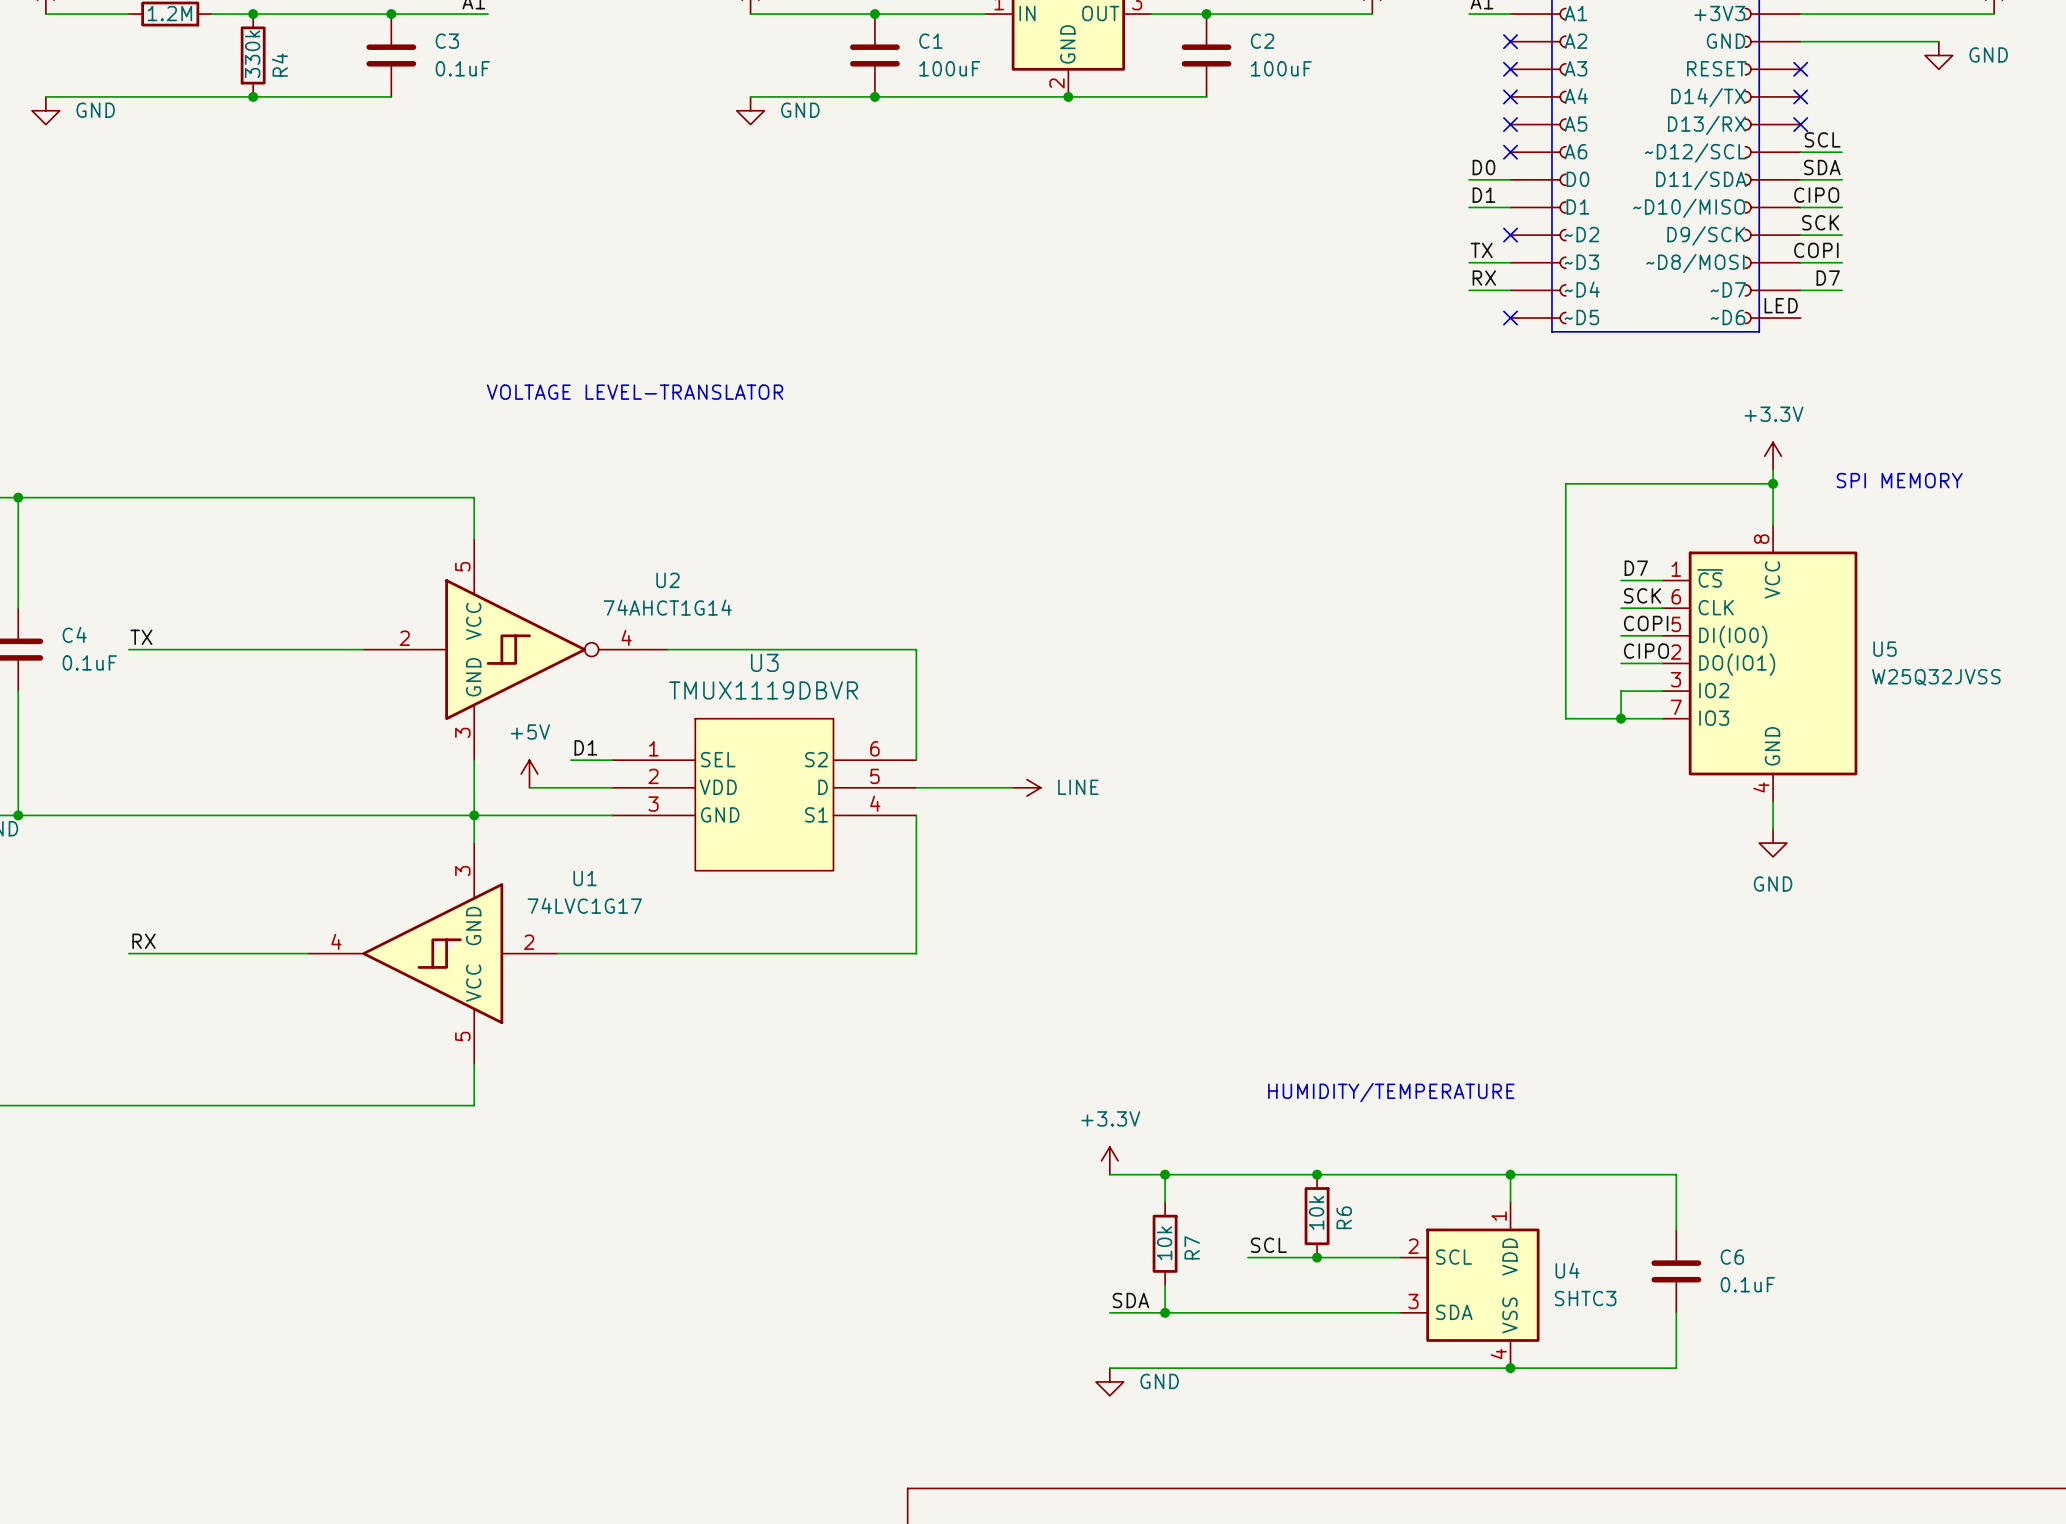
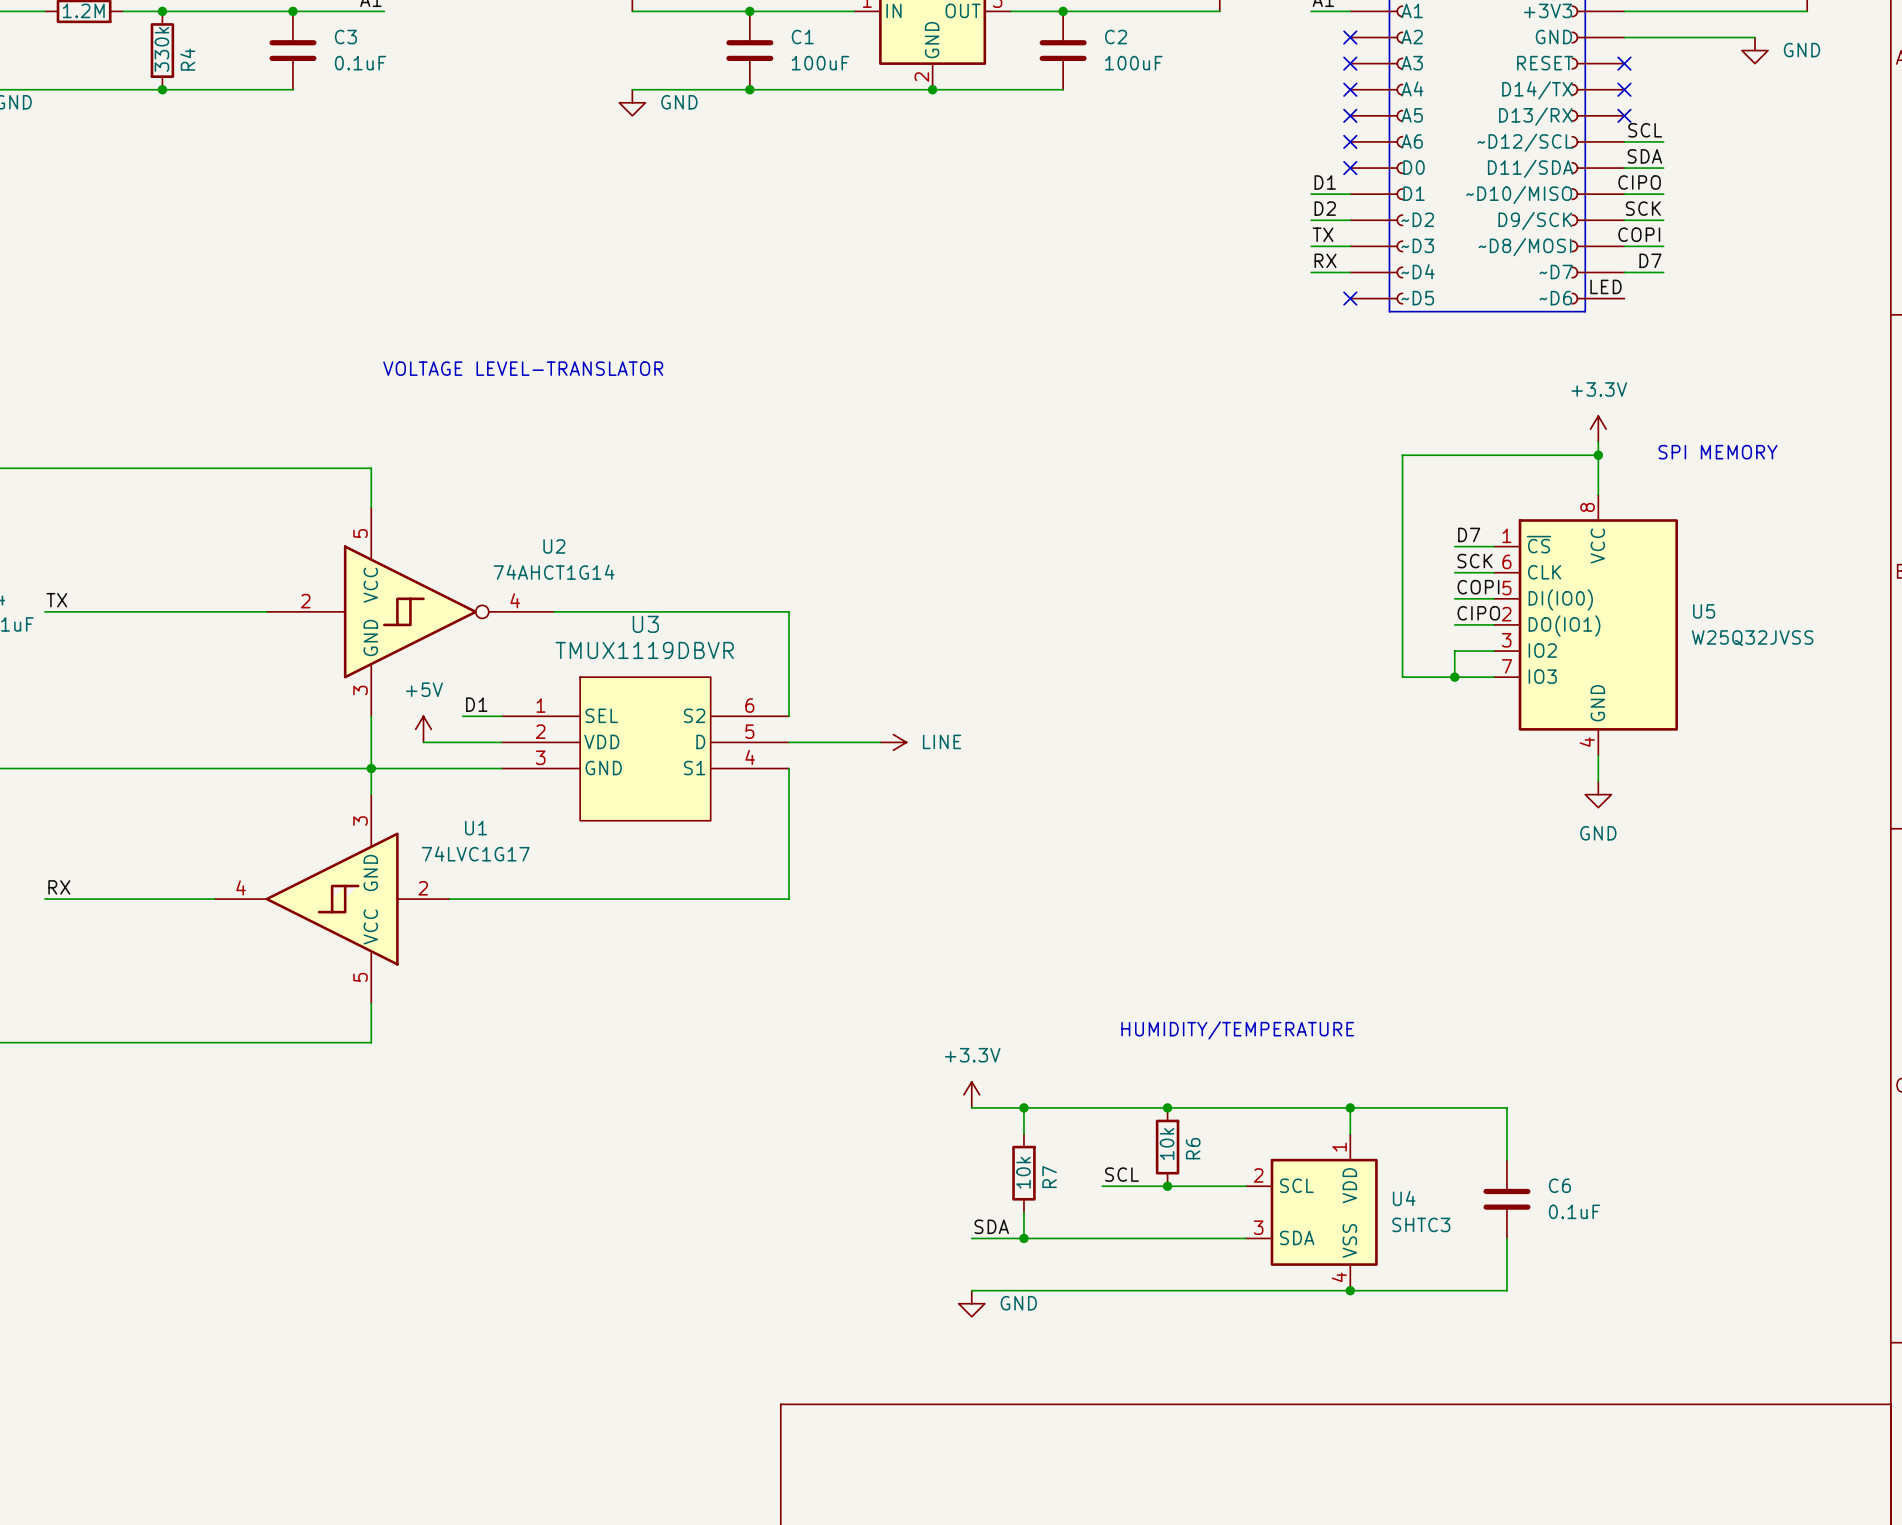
label: D0 (1483, 167) -> none
wire: (1469, 179) (1510, 179) -> (1311, 220) (1350, 220)
label: none -> D2 (1325, 208)
no-connect mark position: (1510, 235) -> (1350, 168)

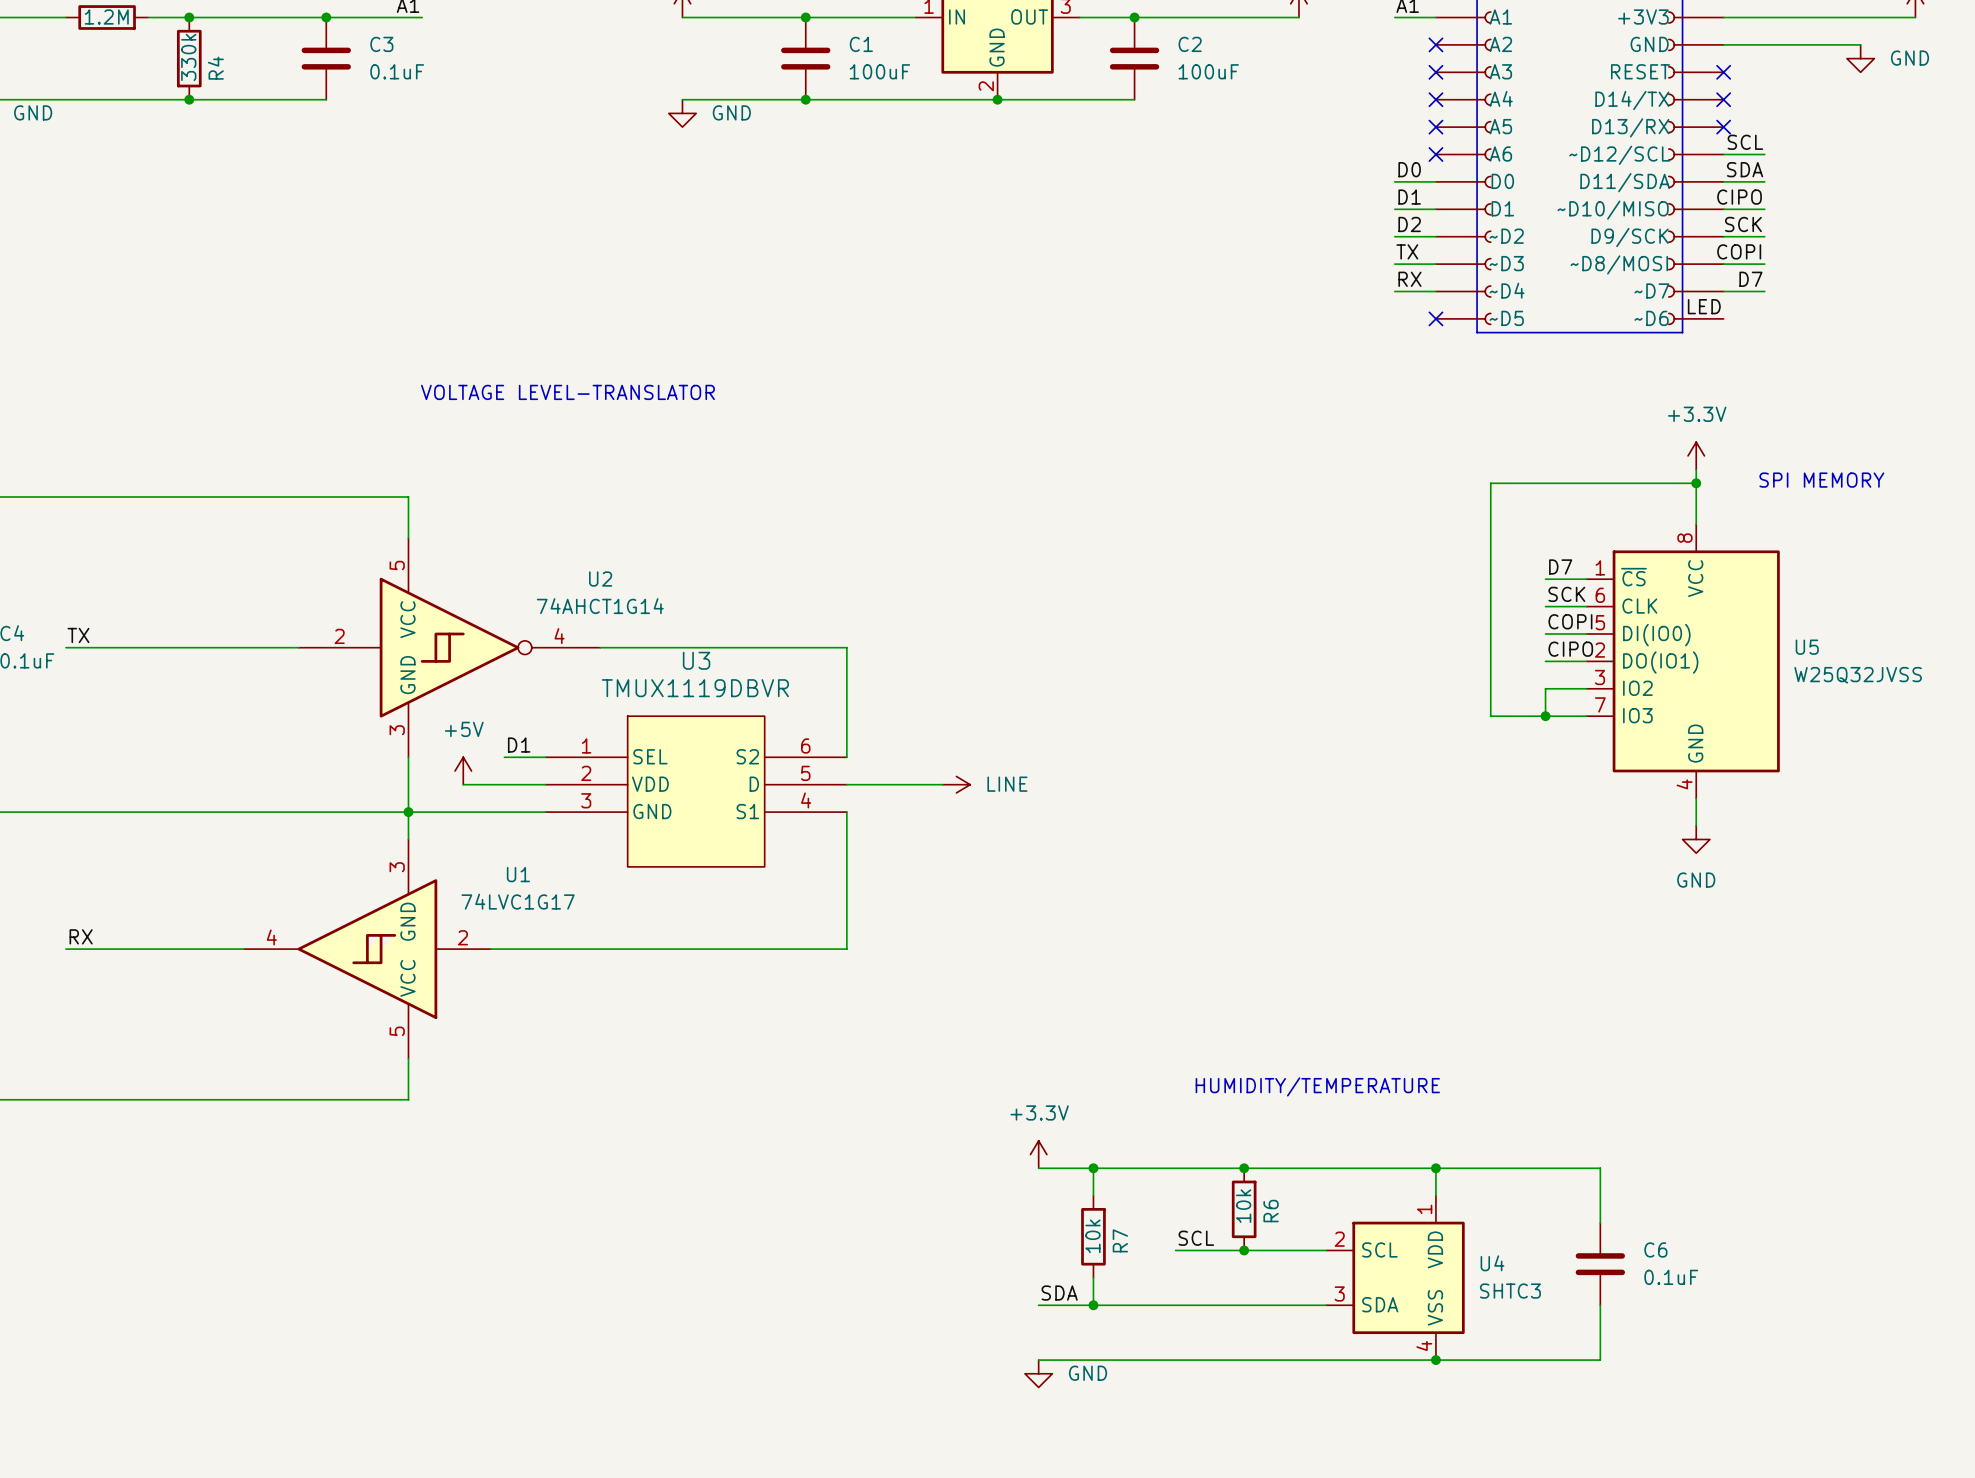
label: none -> D0 (1409, 169)
wire: none -> (1394, 181) (1435, 181)
no-connect mark: (1350, 168) -> none

